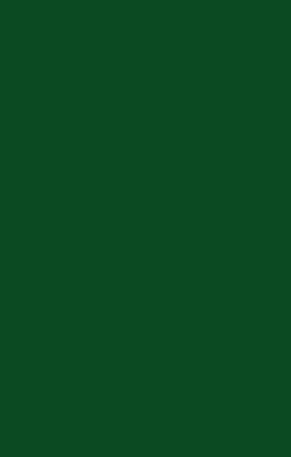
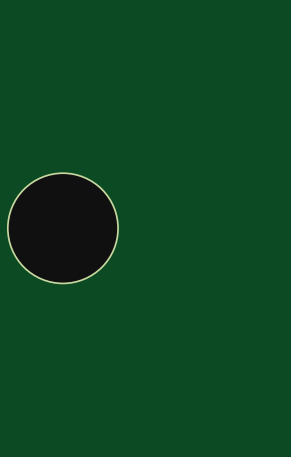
part: none -> (62, 228)

